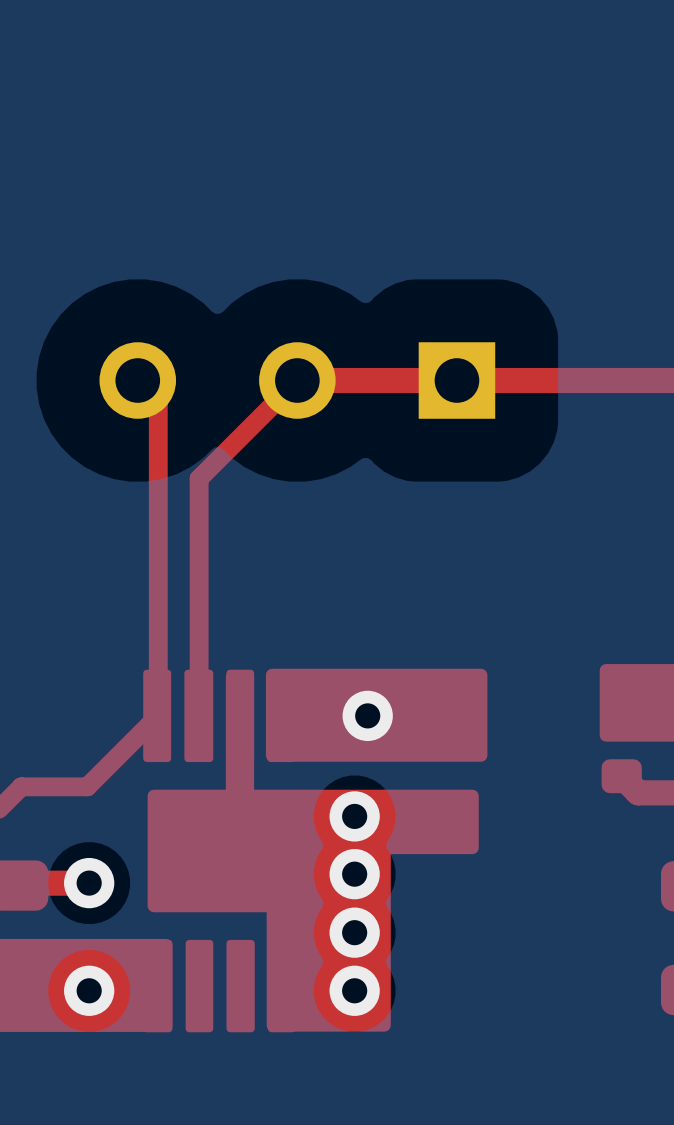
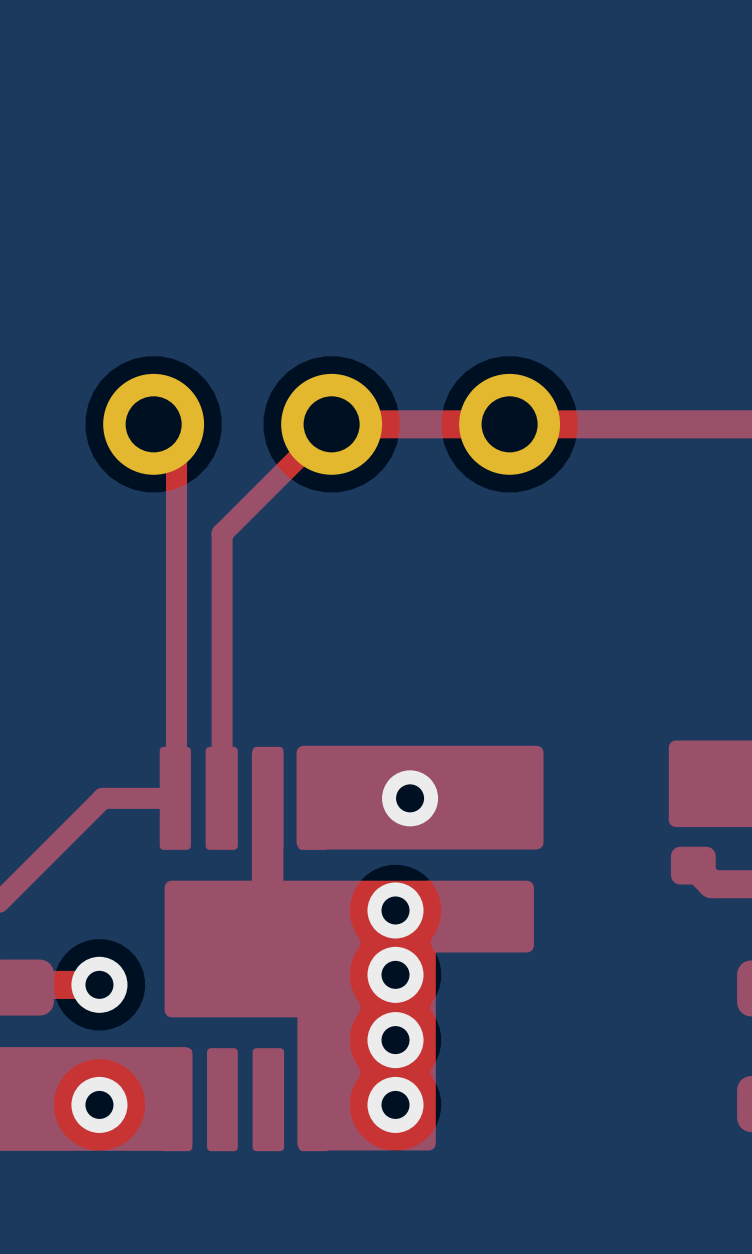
part footprint: [99, 342, 496, 419] -> [103, 373, 561, 475]
top track: (158, 715) (87, 786) (21, 786) -> (176, 798) (102, 798) (23, 877)

